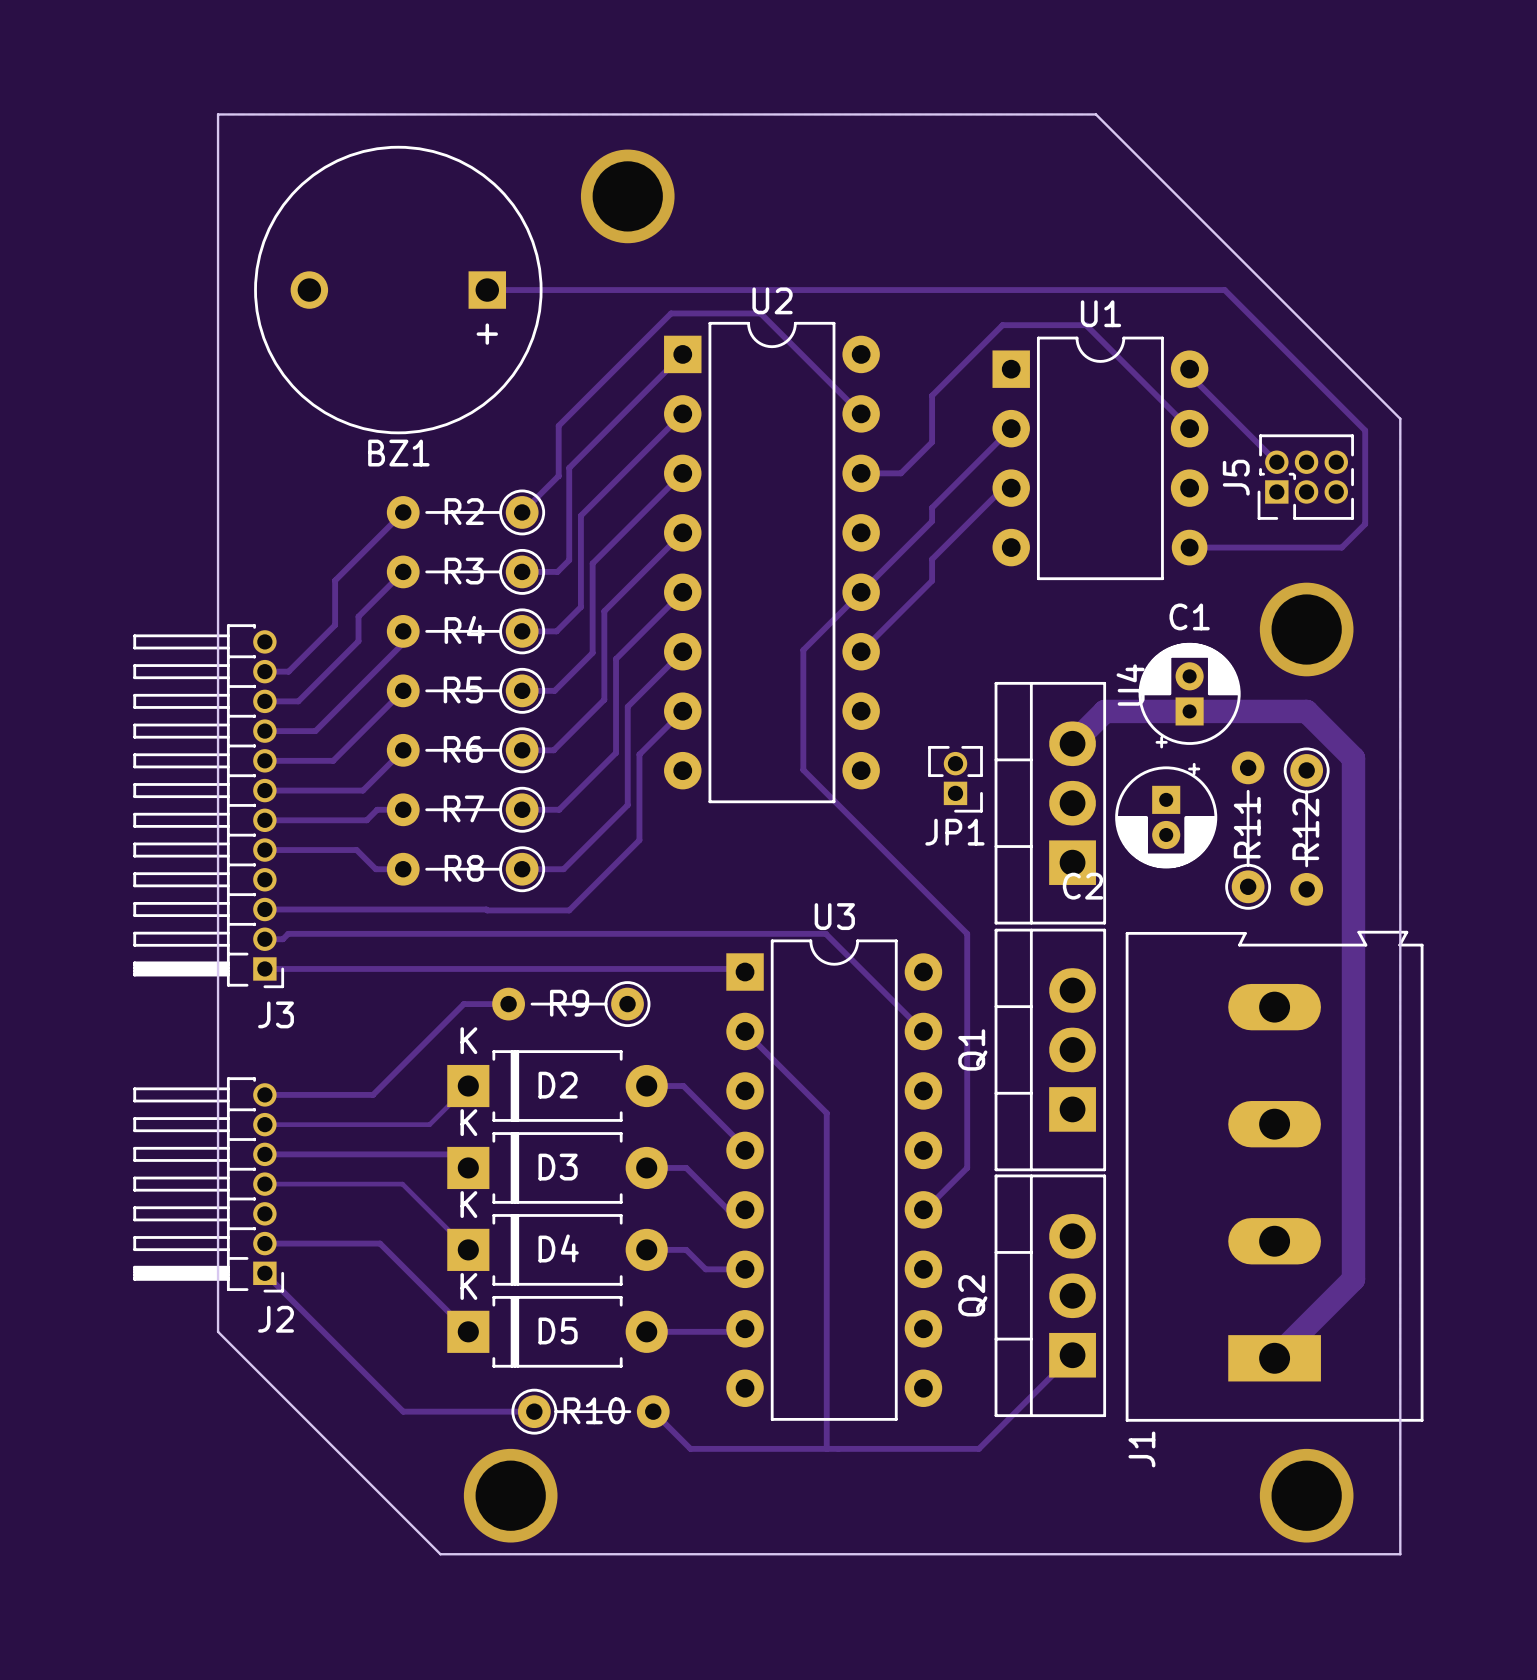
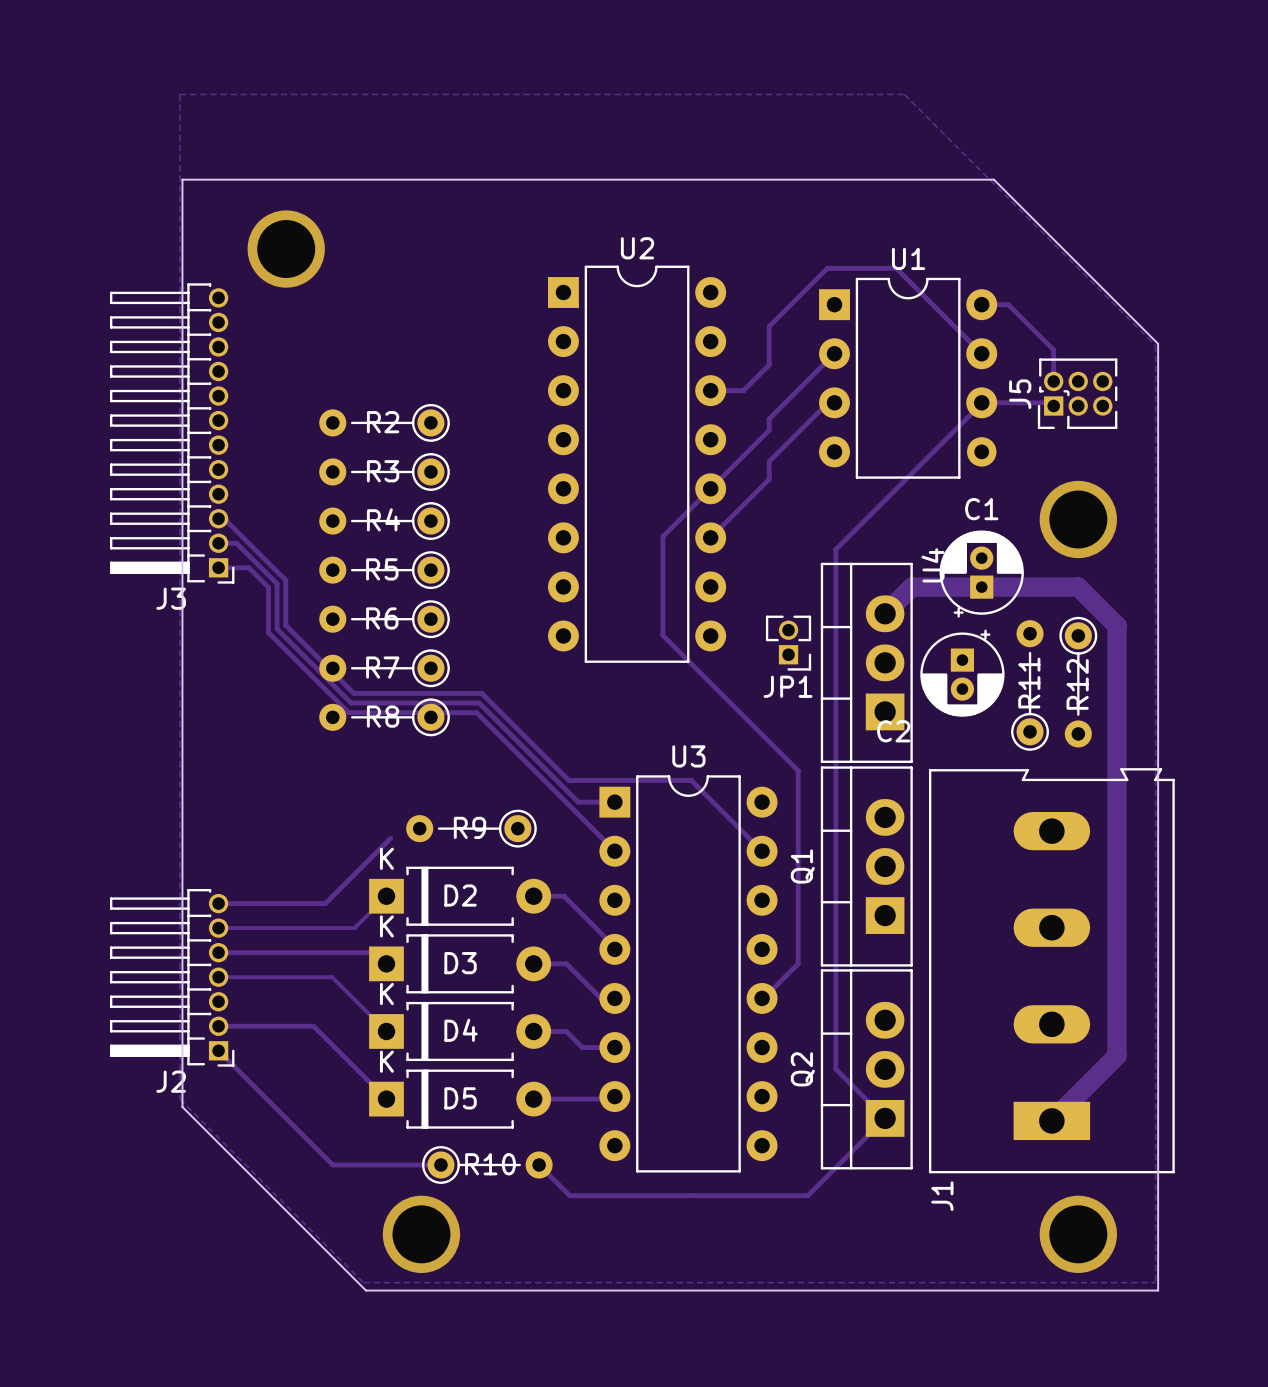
board edge: (218, 114) (218, 1331) (440, 1554) (1400, 1554) (1400, 418) (1095, 114) (218, 114) -> (182, 179) (182, 1107) (366, 1290) (1158, 1290) (1158, 343) (993, 179) (182, 179)
via: (627, 196) -> none
BZ1: (398, 290) -> none
track: (487, 290) (1224, 290) (1365, 430) (1365, 524) (1341, 547) (1189, 547) -> none
via: none -> (286, 249)
track: (682, 354) (569, 467) (569, 560) (557, 571) (522, 571) -> none
track: (1189, 369) (1189, 375) (1276, 462) -> (981, 304) (1008, 304) (1053, 349) (1053, 381)
track: (682, 413) (580, 515) (580, 607) (556, 631) (522, 631) -> none
track: (861, 413) (760, 313) (671, 313) (558, 425) (558, 476) -> none
track: (682, 473) (592, 563) (592, 652) (554, 690) (522, 690) -> none
track: (558, 476) (522, 512) -> none
track: none -> (1053, 406) (1050, 402) (981, 402) (835, 549) (835, 1069) (885, 1118)
track: (403, 512) (335, 580) (335, 625) (288, 671) (264, 671) -> none
track: (682, 532) (604, 611) (604, 699) (553, 750) (522, 750) -> none
track: (403, 571) (358, 616) (358, 641) (298, 701) (264, 701) -> none
track: (682, 592) (616, 659) (616, 752) (559, 809) (522, 809) -> none
track: (403, 631) (403, 643) (315, 731) (264, 731) -> none
track: (682, 651) (627, 706) (627, 805) (563, 869) (522, 869) -> none
track: (403, 690) (333, 760) (264, 760) -> none
track: (682, 711) (639, 754) (639, 840) (569, 910) (264, 909) -> none
track: (403, 750) (362, 790) (264, 790) -> none
J3 position: (208, 806) -> (172, 433)
track: (403, 809) (377, 809) (366, 820) (264, 820) -> none
track: (264, 850) (356, 850) (375, 869) (403, 869) -> none
track: (264, 939) (282, 939) (288, 933) (825, 933) (837, 945) -> (218, 518) (224, 518) (285, 580) (285, 625) (353, 693) (481, 693) (568, 780) (691, 780)
track: (264, 968) (741, 968) (745, 972) -> (218, 543) (236, 543) (277, 583) (277, 628) (351, 703) (479, 703) (578, 802) (614, 802)
track: (508, 1004) (463, 1004) (373, 1094) -> (390, 838) (325, 903) (307, 903)
J3 name position: J3 (276, 1014) -> J3 (171, 598)
track: (745, 1031) (826, 1113) (826, 1448) -> (614, 850) (476, 712) (348, 712) (268, 632) (268, 587) (248, 567) (218, 567)
J2 name position: J2 (276, 1319) -> J2 (171, 1081)

